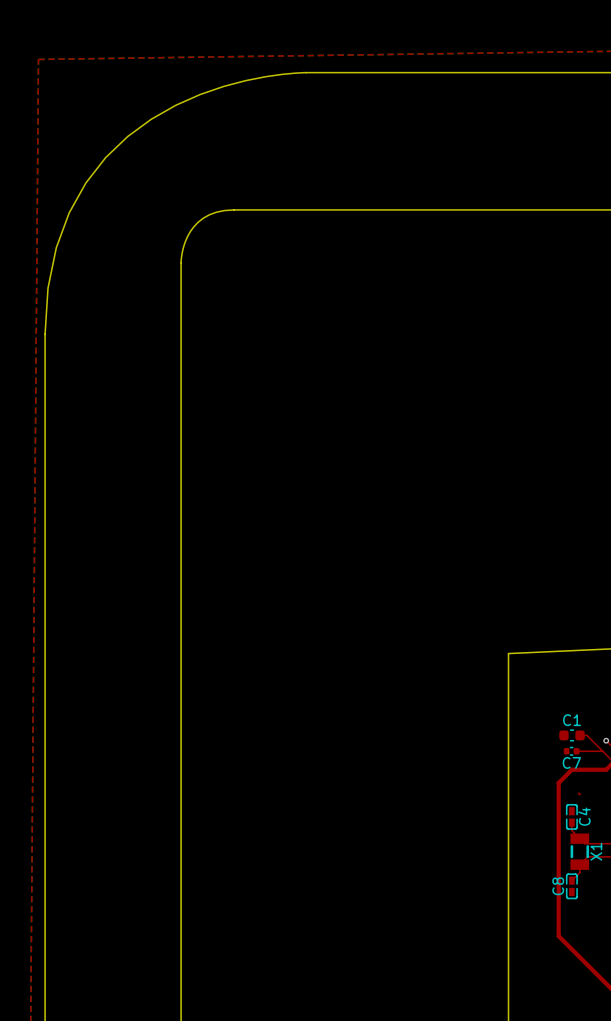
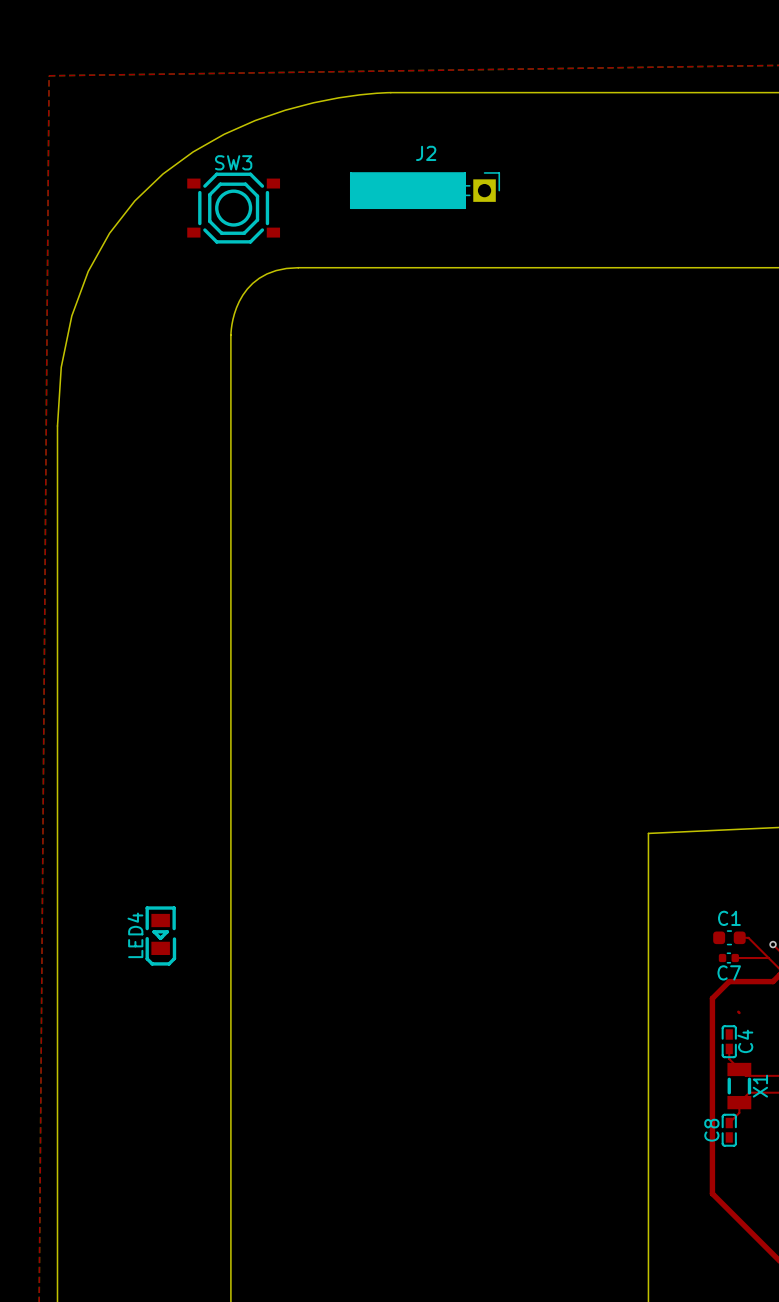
J2: none -> (425, 190)
SW3: none -> (233, 208)
LED4: none -> (160, 935)

